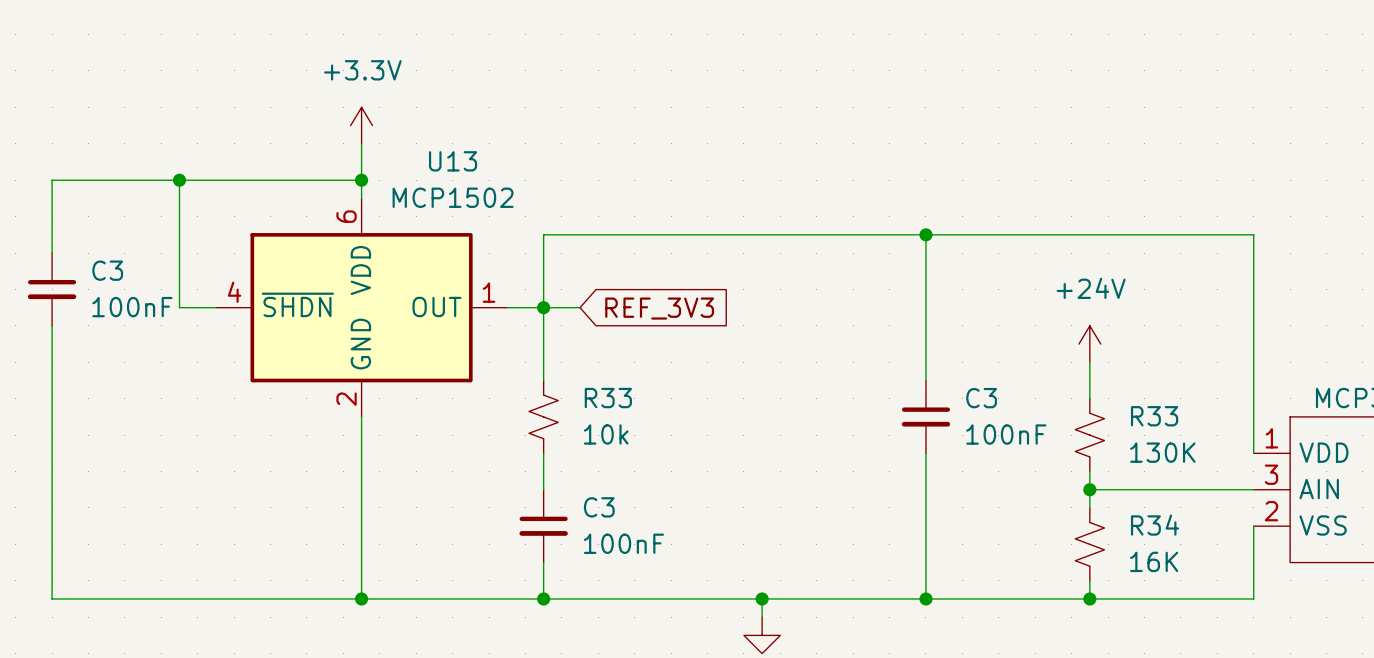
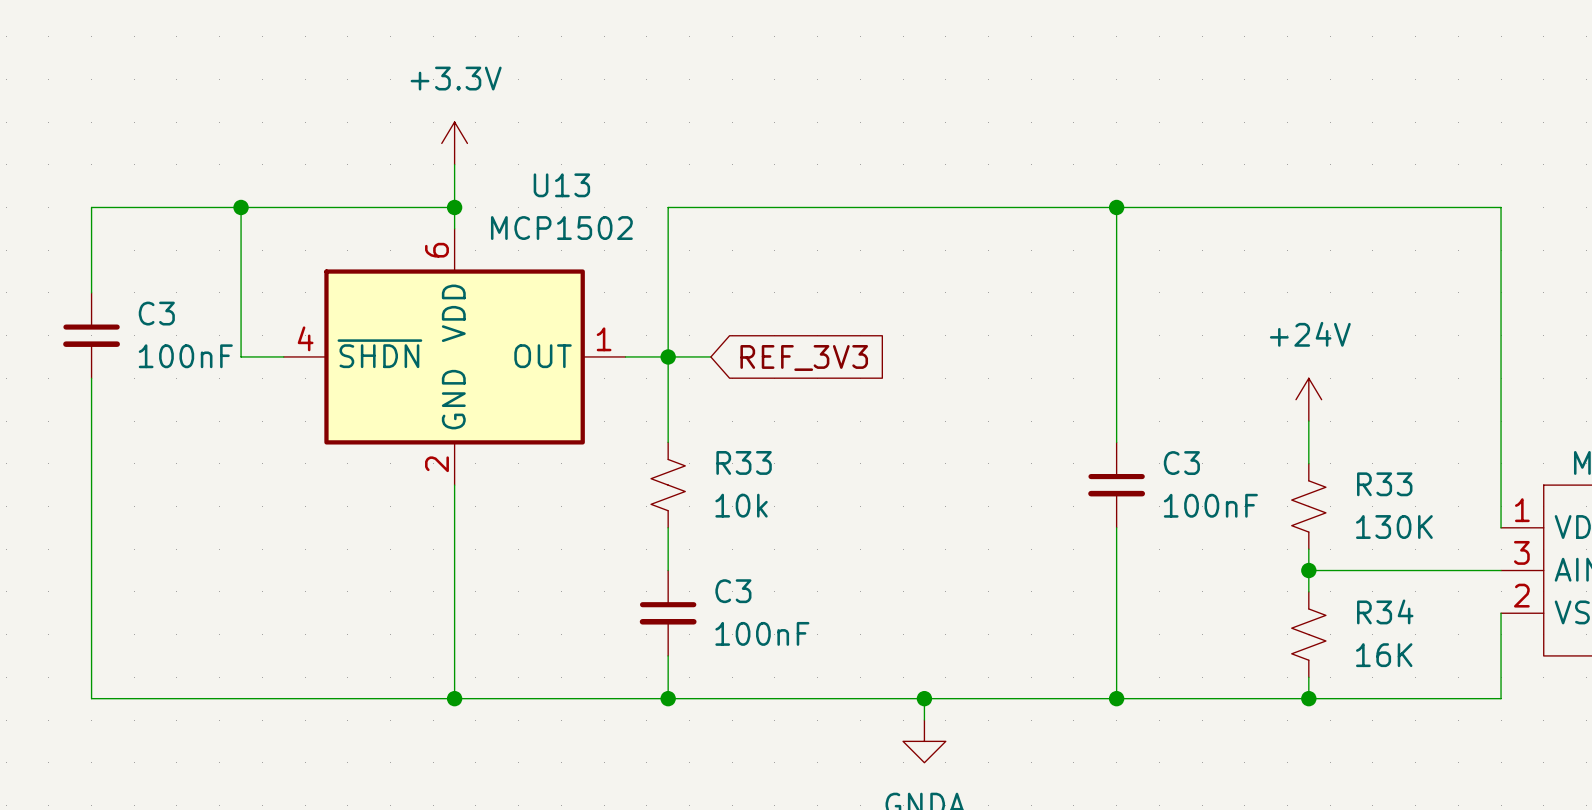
wire: none -> (1116, 207) (1116, 271)
wire: (543, 234) (1253, 234) -> (668, 271) (668, 207) (1501, 207) (1501, 271)
junction position: (925, 234) -> (1116, 207)

